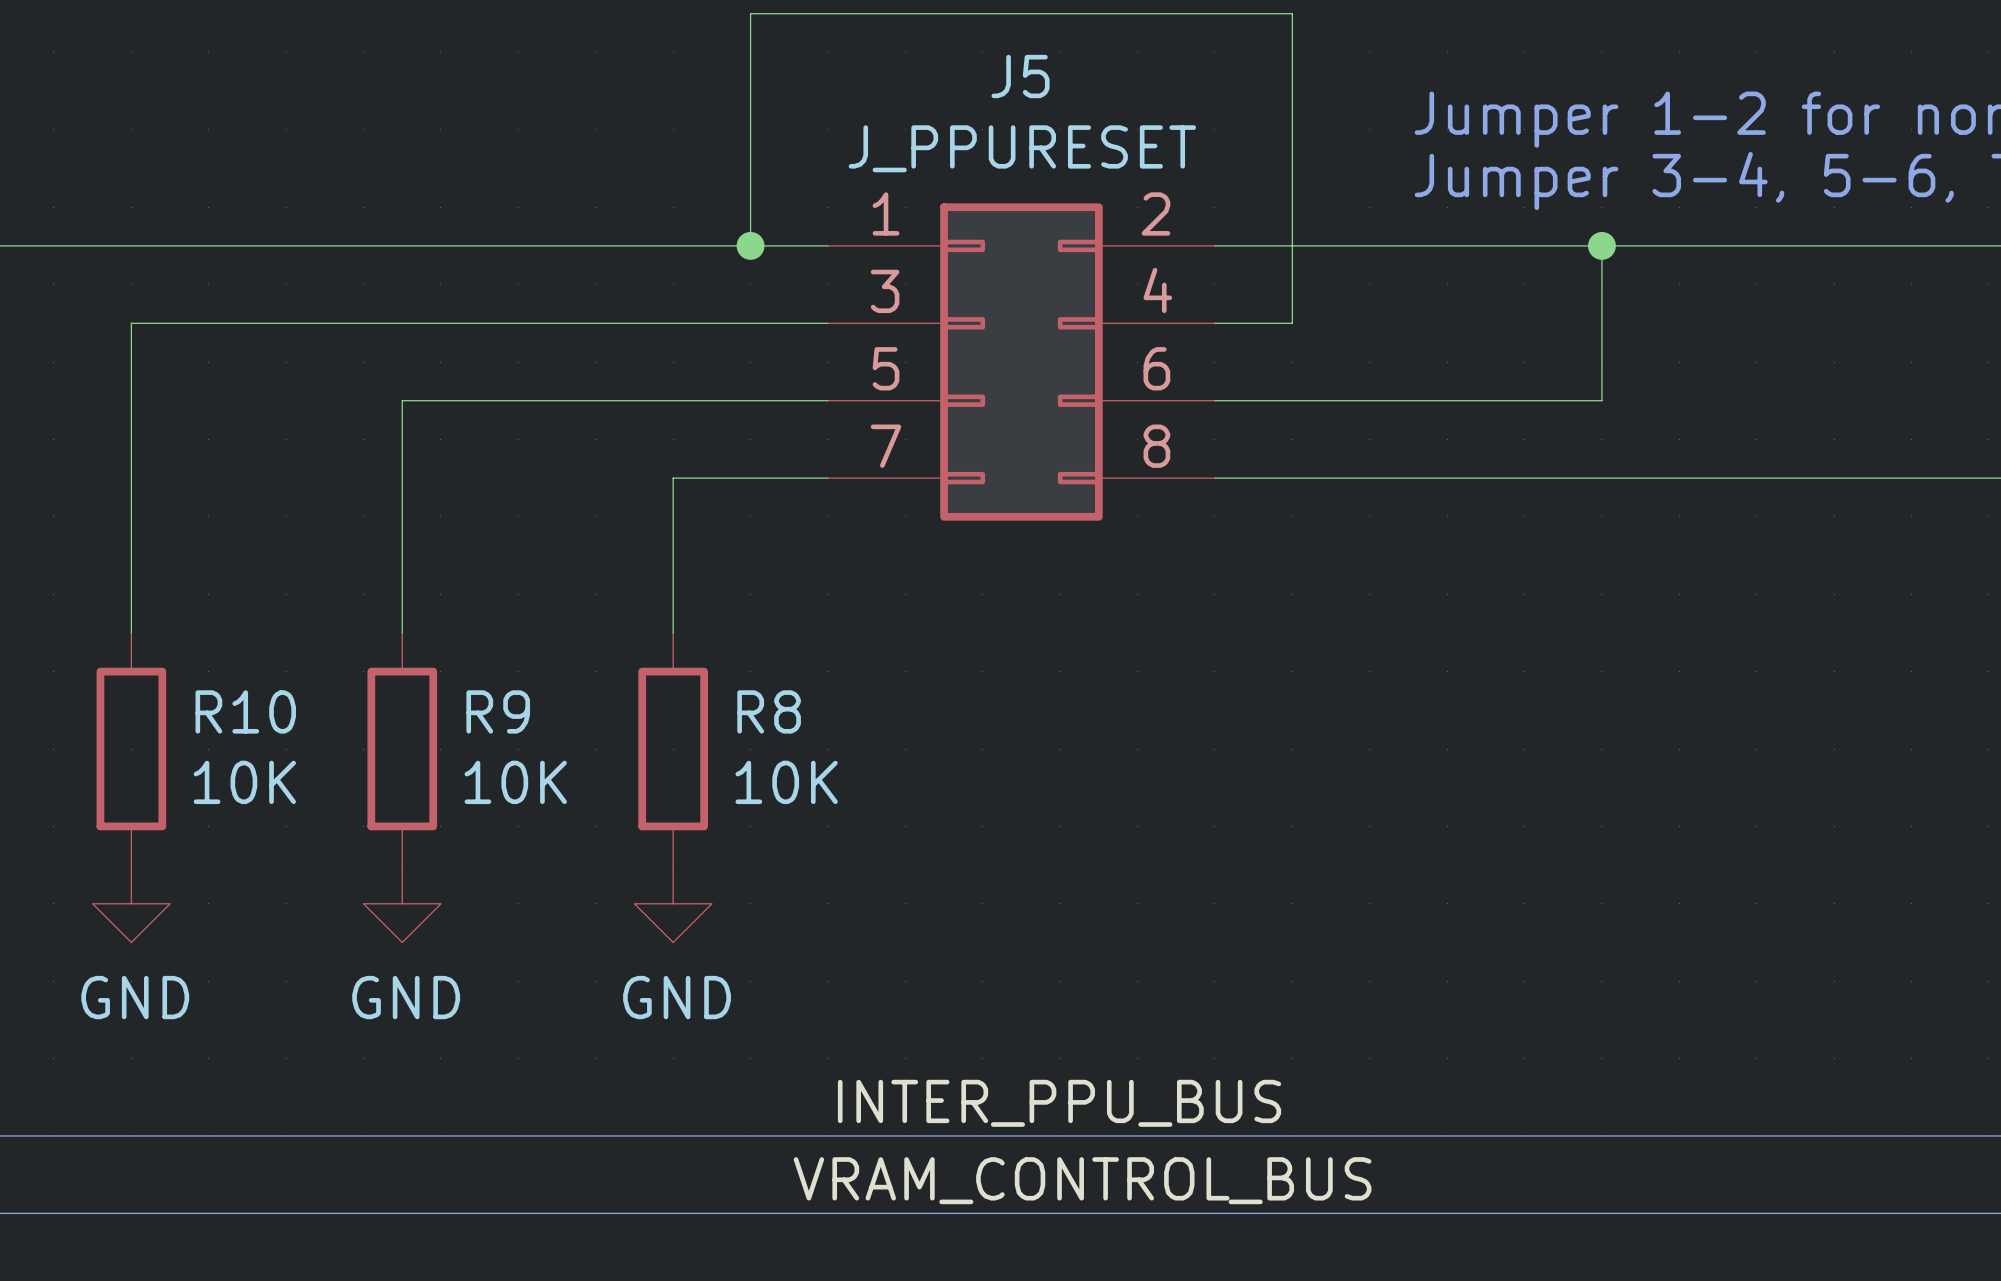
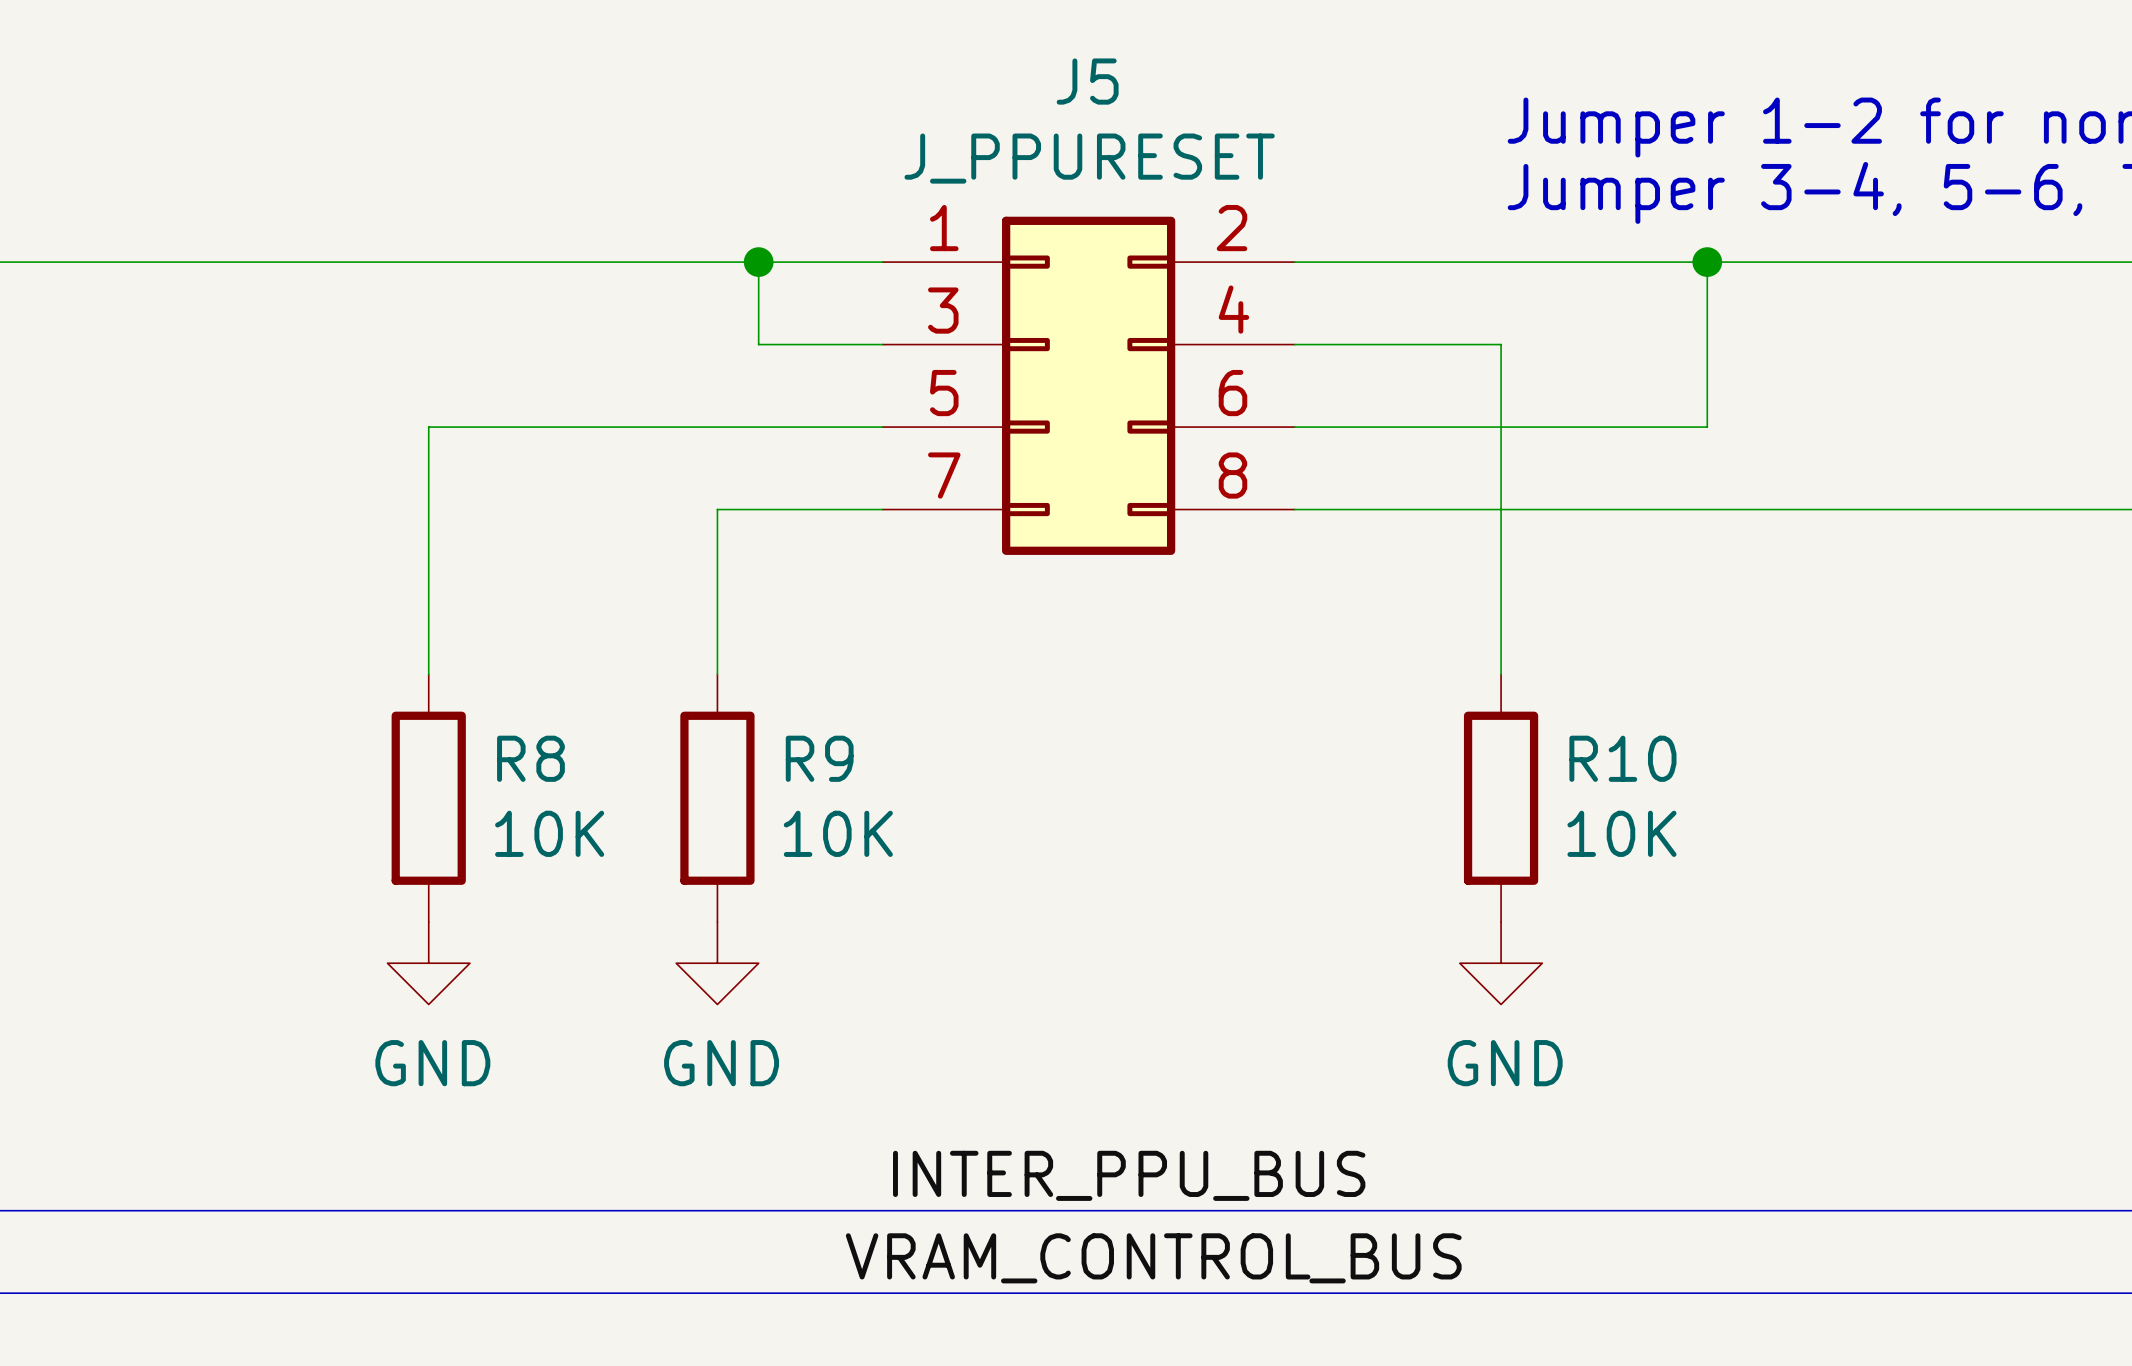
wire: (750, 245) (750, 13) (1292, 13) (1292, 323) -> (1501, 674) (1501, 344) (1377, 344)
junction position: (750, 245) -> (758, 262)
wire: (711, 323) (131, 323) (131, 632) -> (758, 344) (758, 262)
R9 name: R9 (498, 711) -> R8 (530, 758)
R8 name: R8 (769, 711) -> R9 (819, 758)
R10 position: (131, 749) -> (1501, 798)
power symbol: GND (131, 903) -> none
power symbol: none -> GND (1501, 963)

